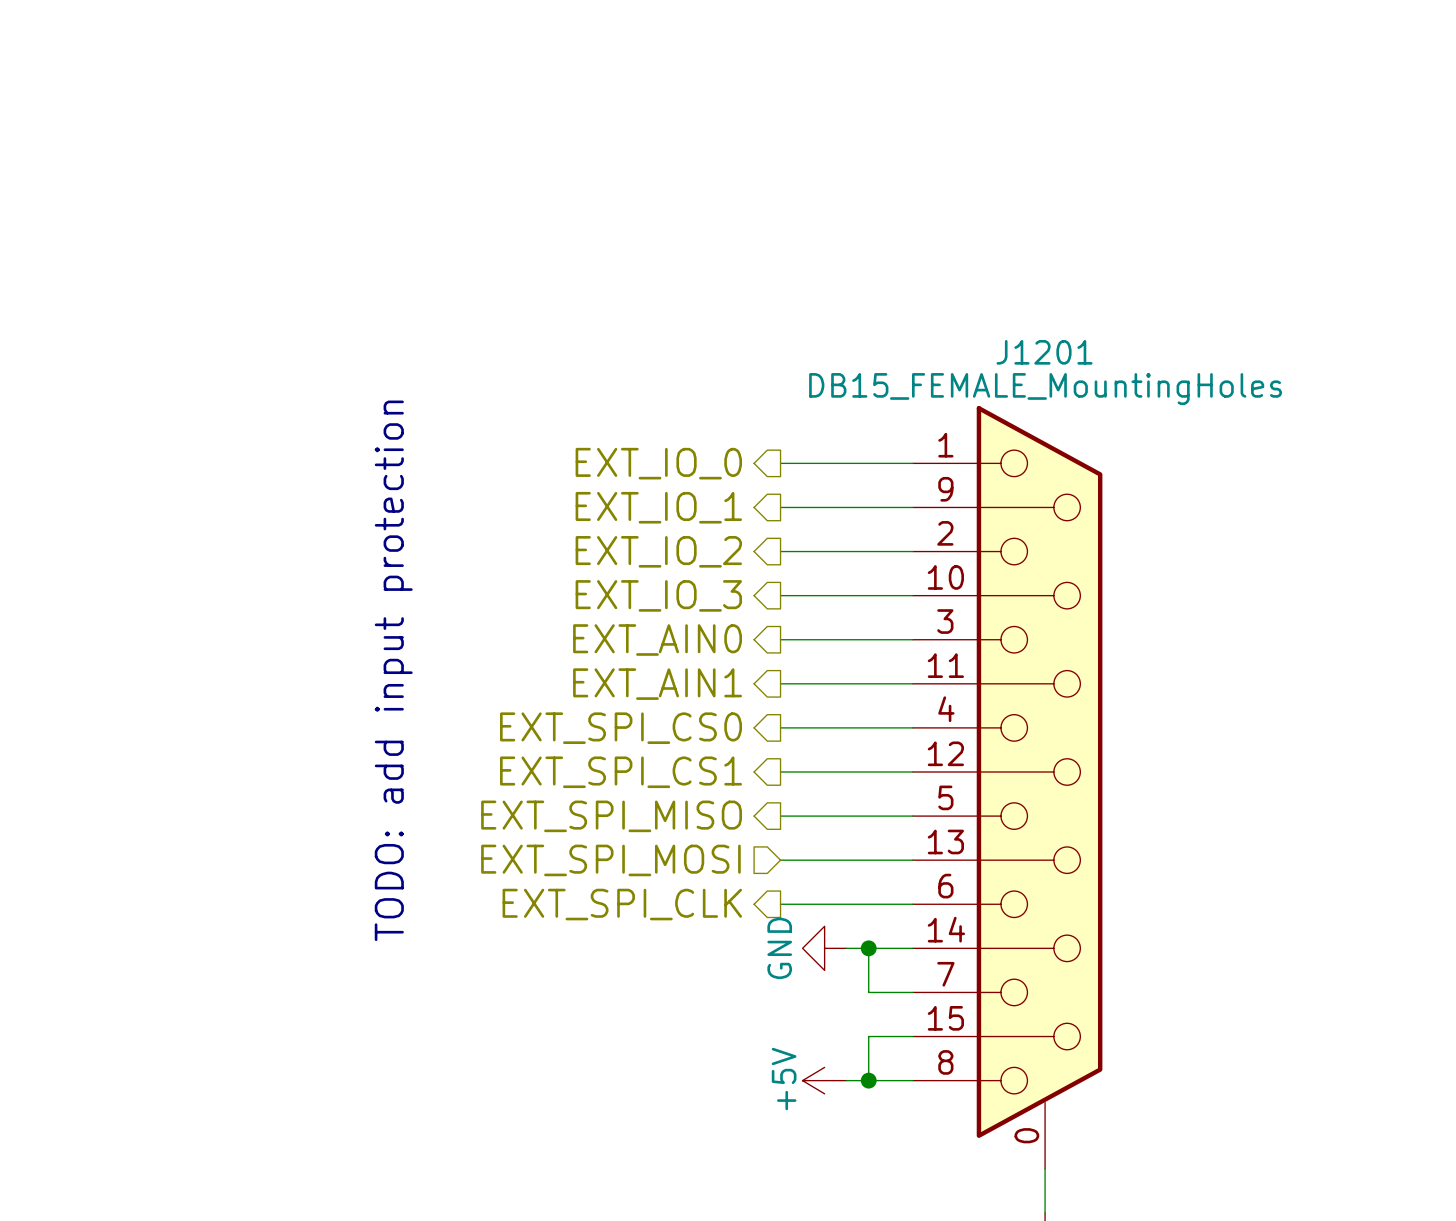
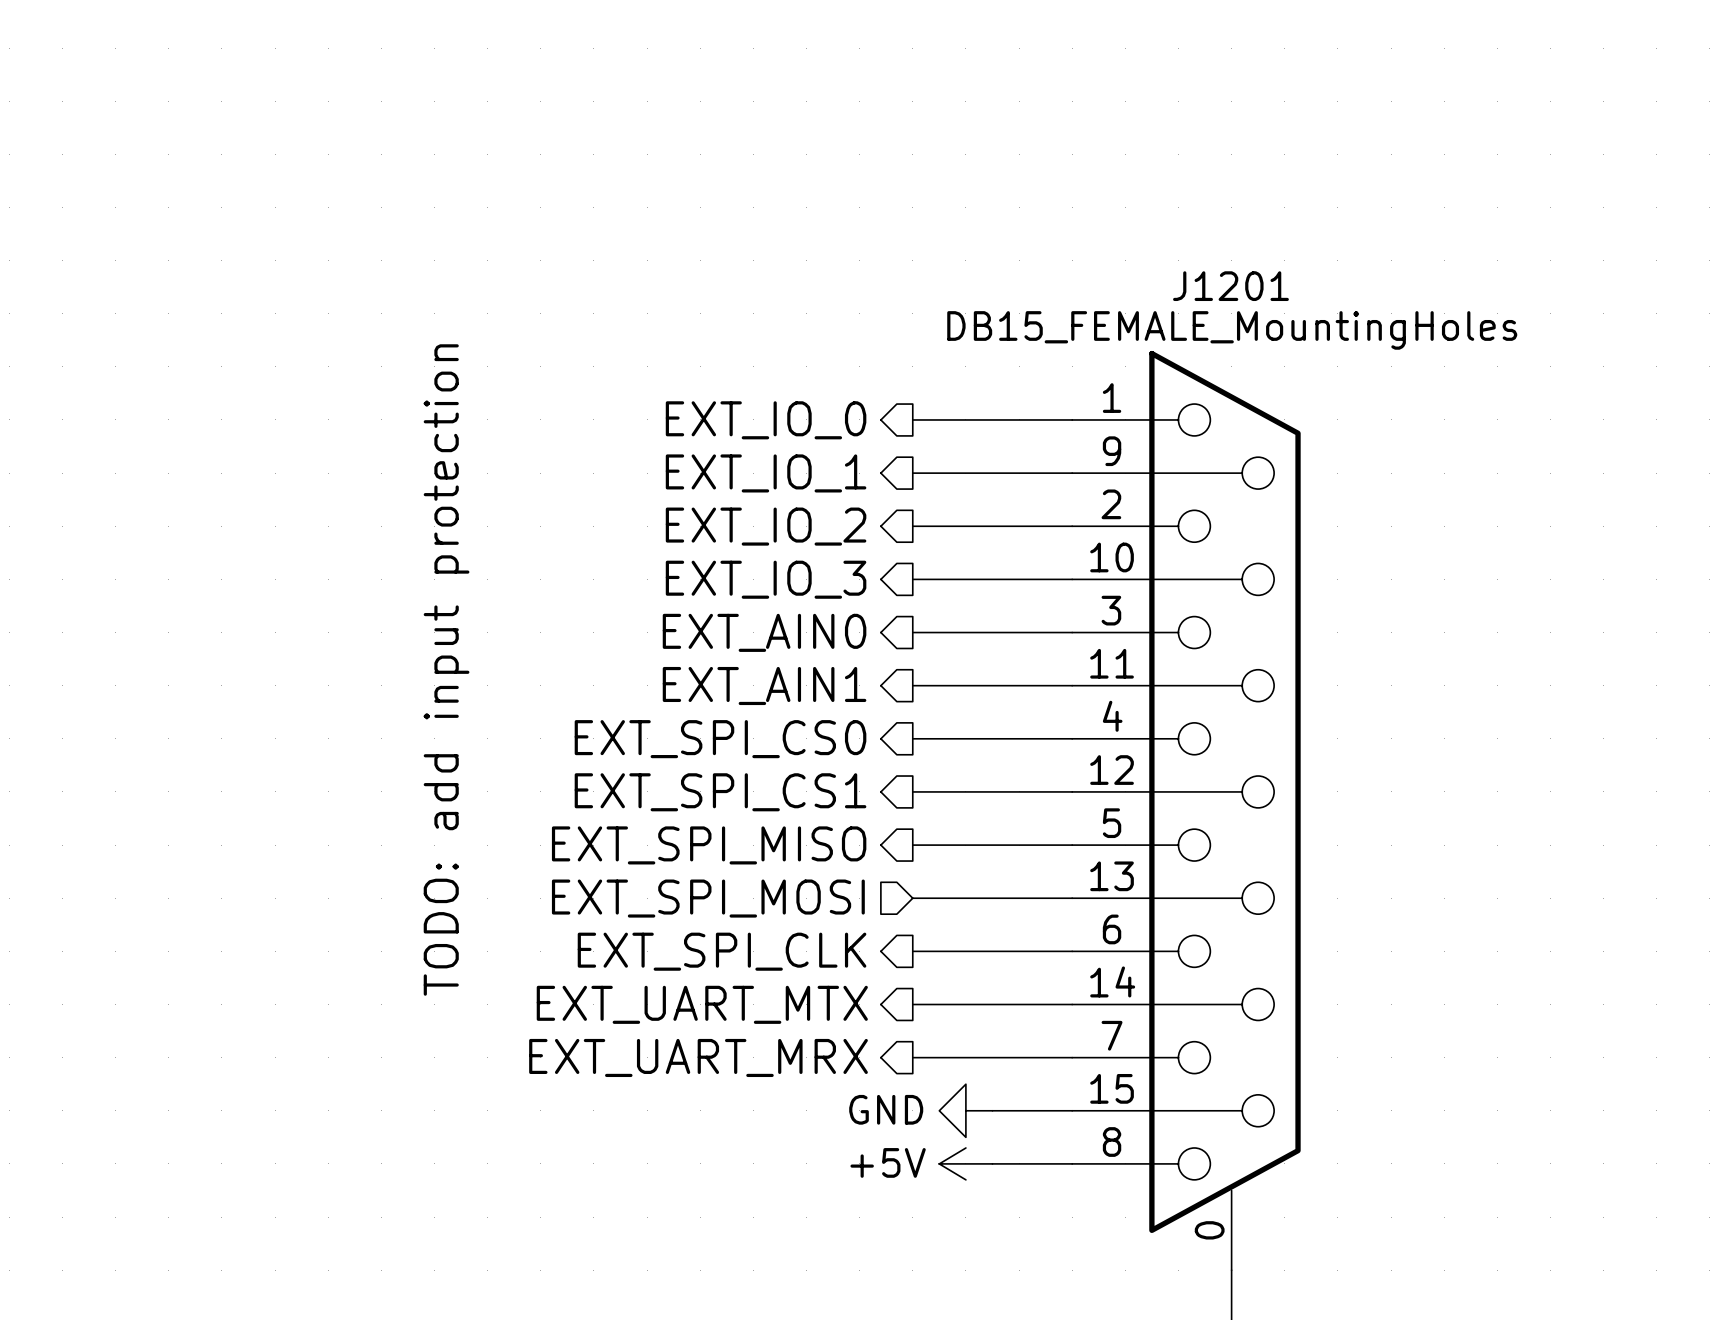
hierarchical label: none -> EXT_UART_MTX (702, 1004)
power symbol text rotation: 0° (779, 948) -> 90° clockwise (886, 1109)
wire: none -> (912, 1004) (992, 1004)
power symbol position: GND (824, 948) -> GND (965, 1110)
wire: (868, 948) (868, 992) -> (912, 1057) (1019, 1057)
junction: (868, 948) -> none
hierarchical label: none -> EXT_UART_MRX (698, 1057)
wire: (868, 1036) (868, 1080) -> (1019, 1110) (992, 1110)
power symbol text rotation: 0° (784, 1079) -> 90° clockwise (888, 1162)
junction: (868, 1080) -> none

